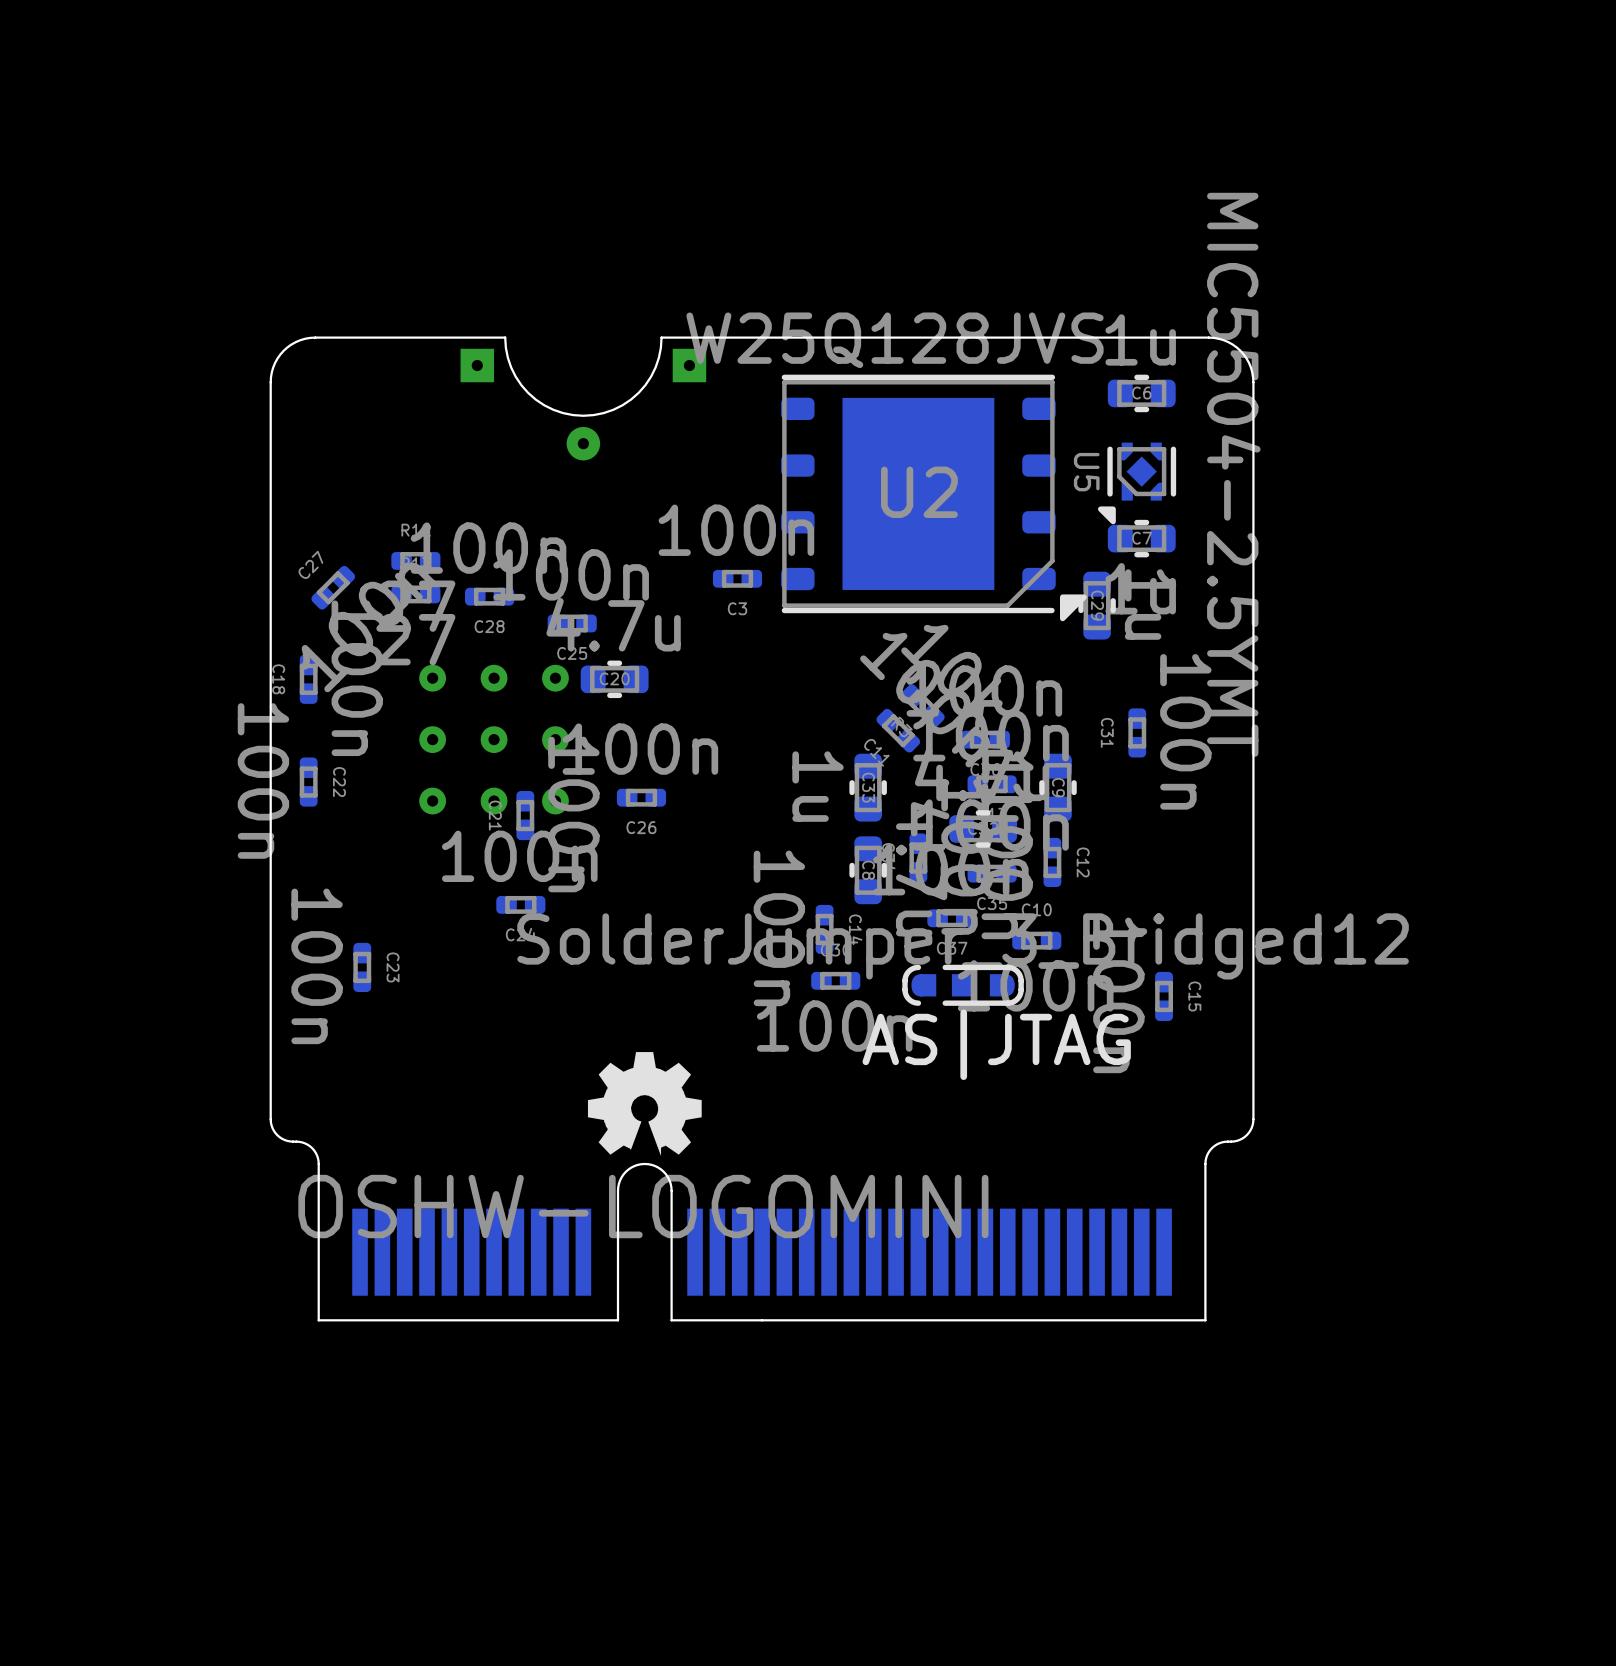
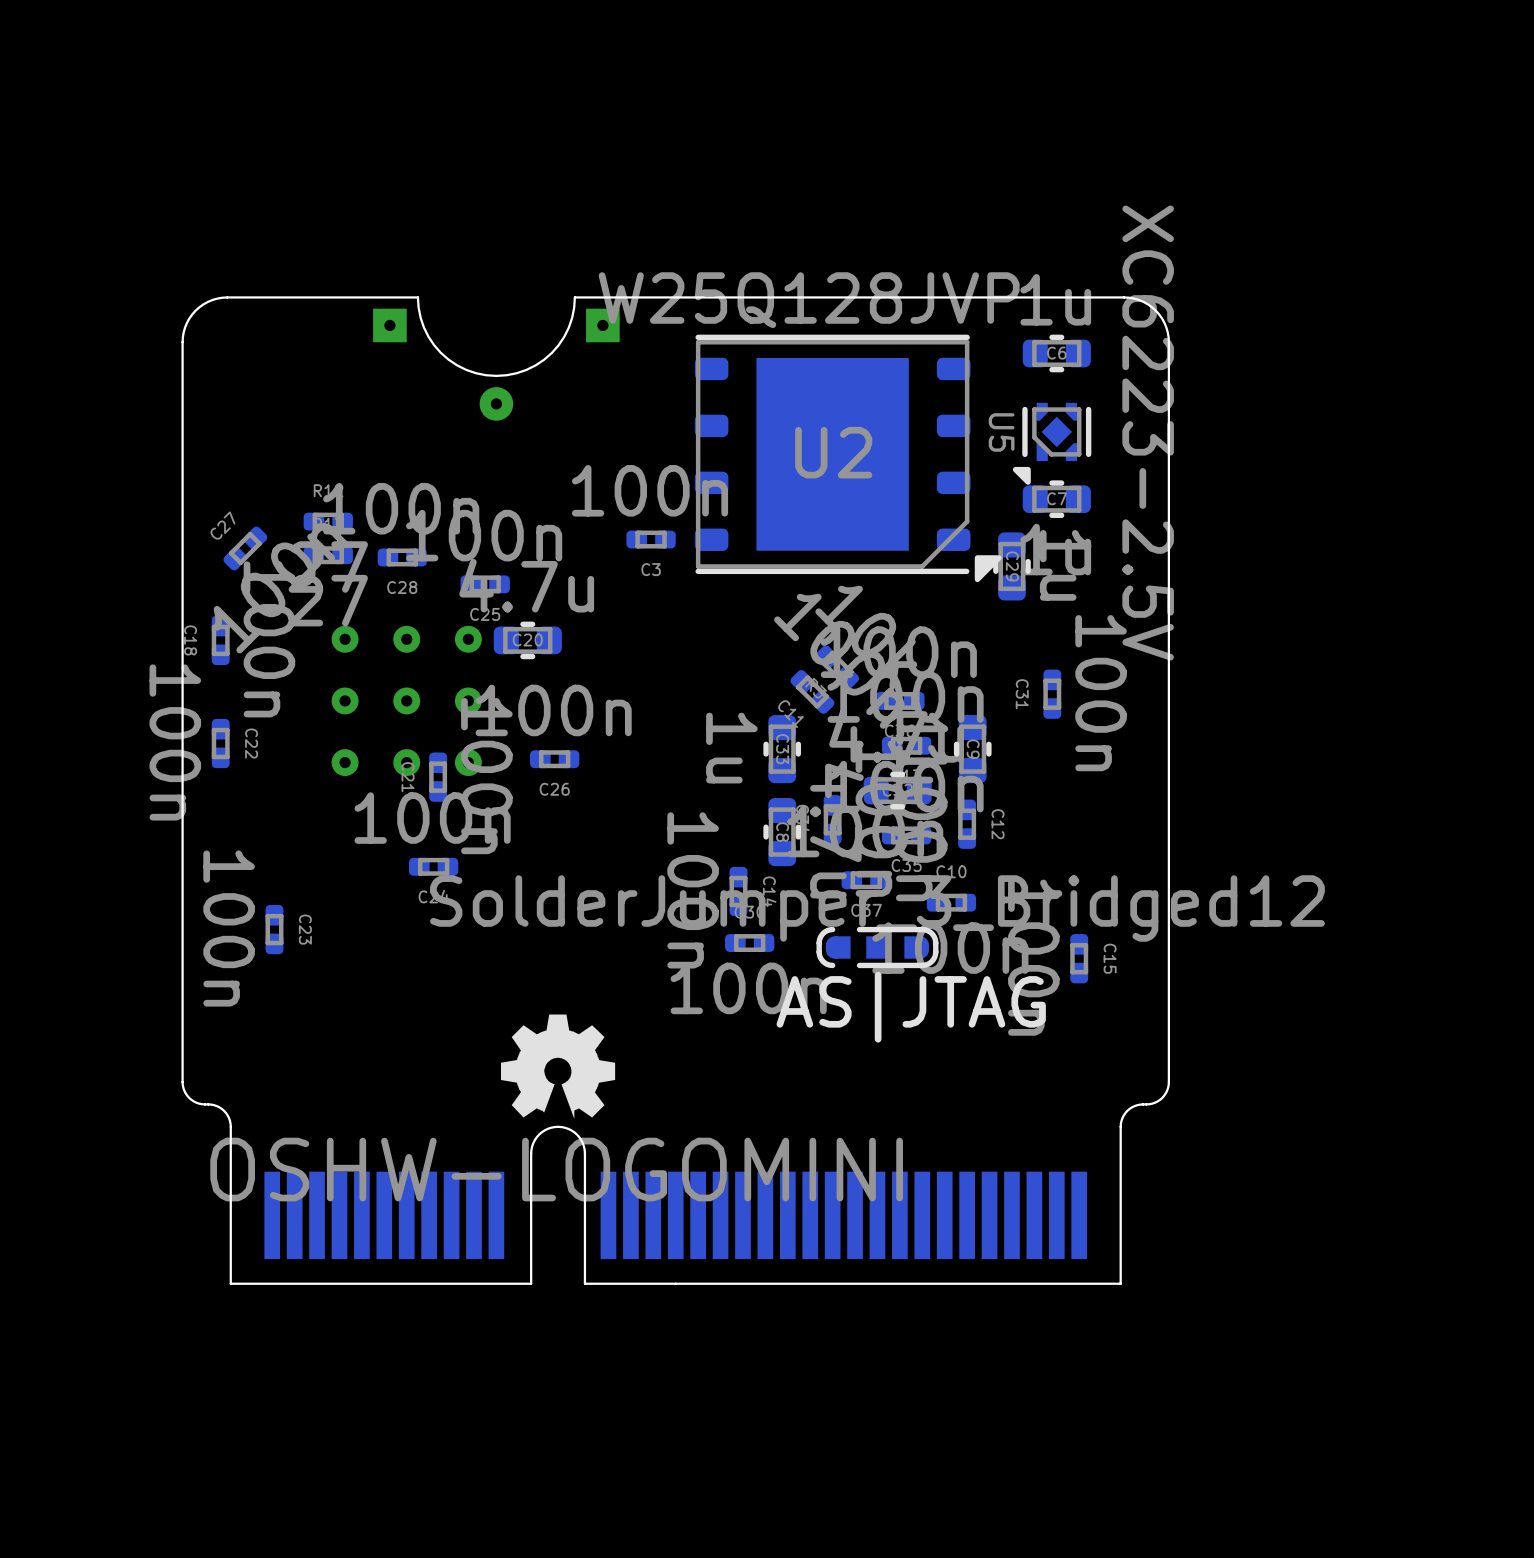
U2 value: W25Q128JVS (895, 340) -> W25Q128JVP (809, 300)
U5 value: MIC5504-2.5YMT (1233, 474) -> XC6223-2.5V (1148, 433)

